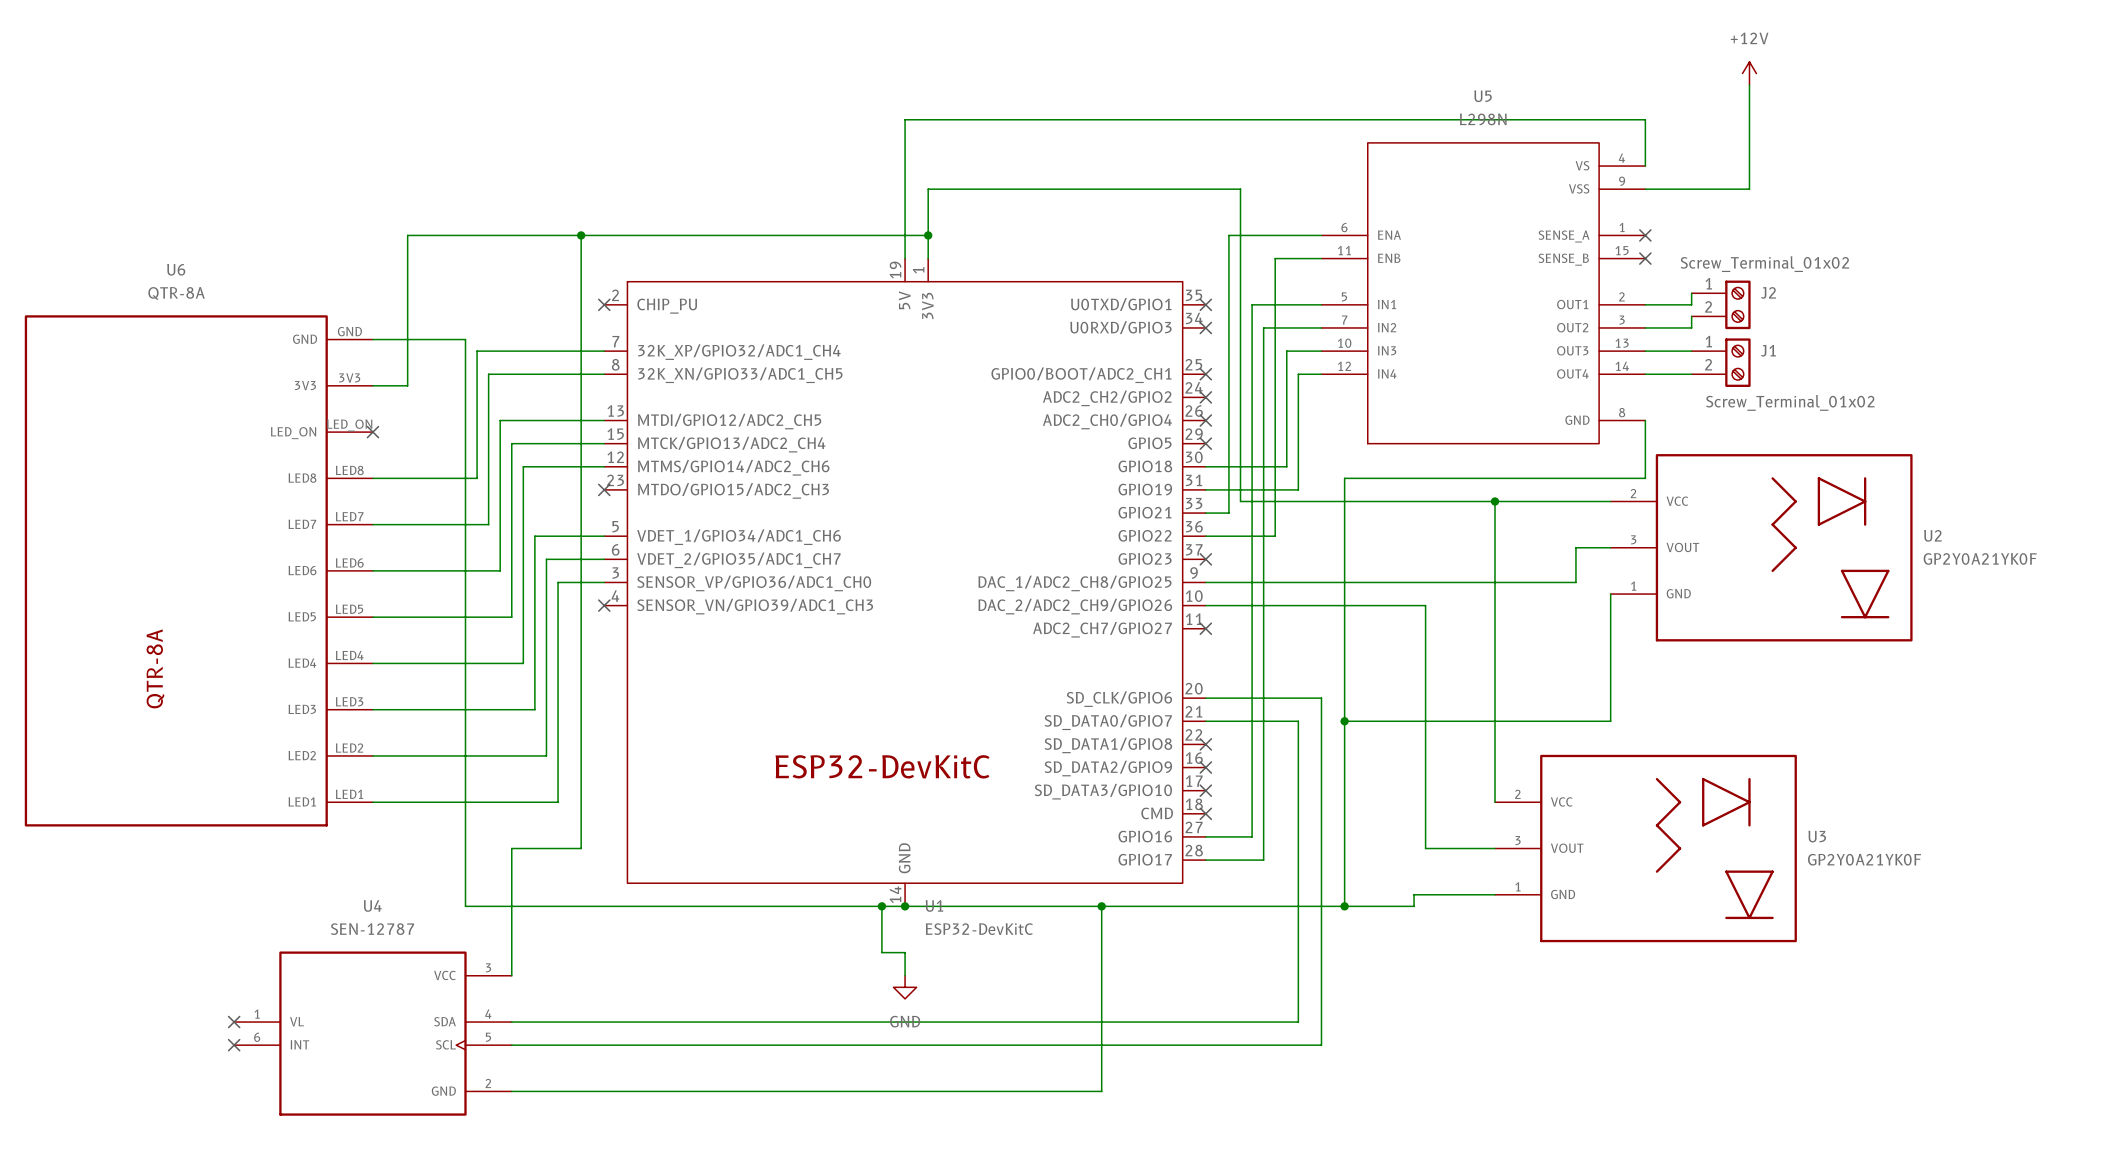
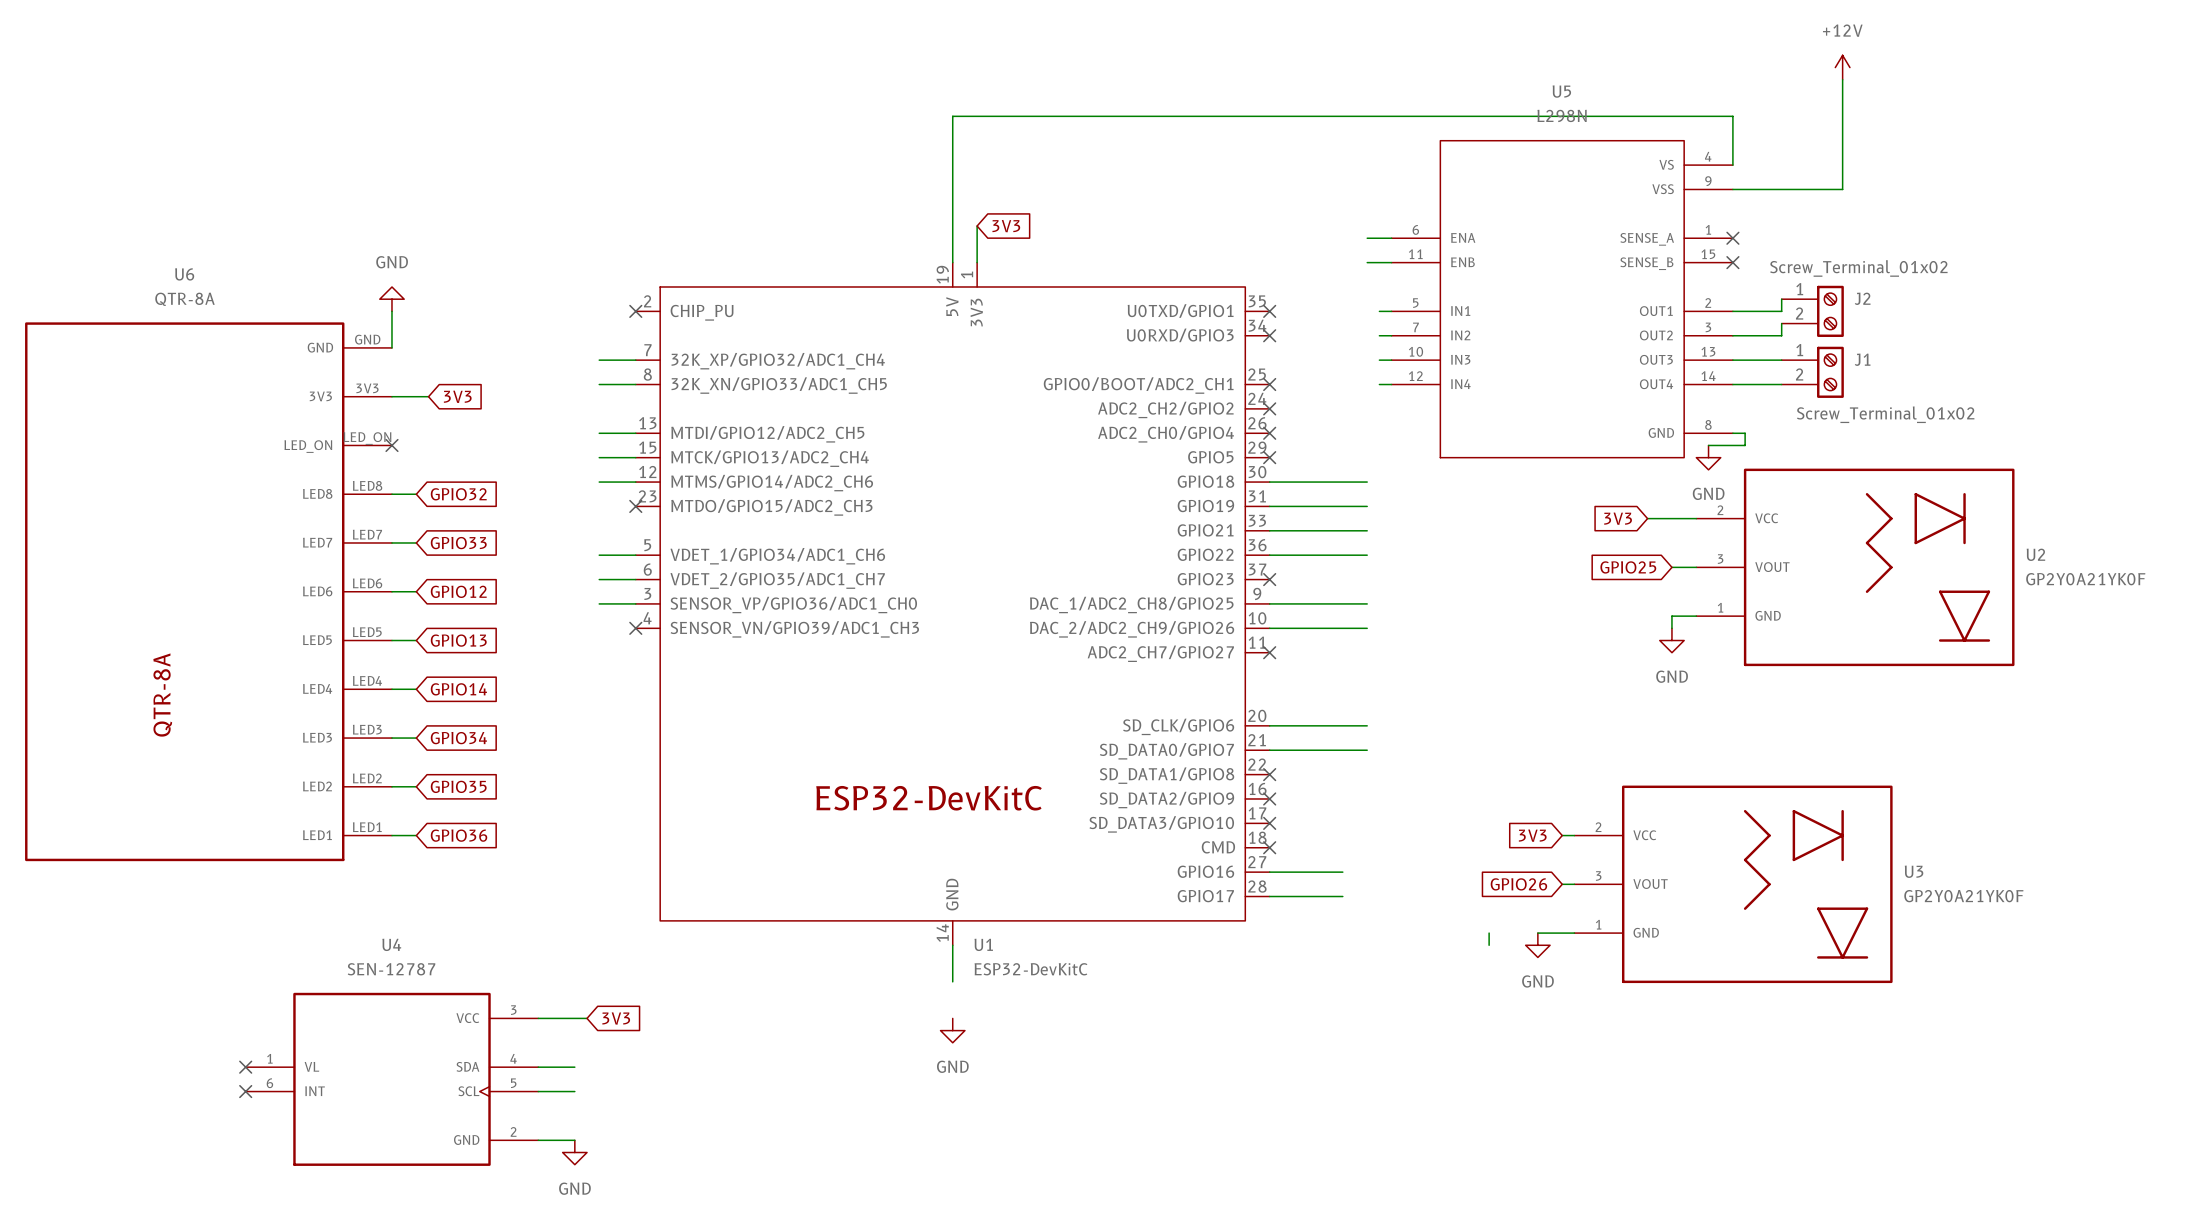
wire: (928, 223) (928, 189) (1240, 189) (1240, 501) (1564, 501) -> none
global label: none -> 3V3 (1006, 226)
wire: (581, 235) (581, 848) (511, 848) (511, 975) -> (587, 1018) (538, 1018)
junction: (581, 235) -> none
wire: (928, 235) (407, 235) (407, 385) -> none
junction: (928, 235) -> none
wire: (1298, 235) (1228, 235) (1228, 513) -> (1367, 530) (1294, 530)
wire: (1298, 258) (1275, 258) (1275, 536) -> (1367, 555) (1342, 555)
power symbol: none -> GND (391, 299)
wire: (1309, 304) (1252, 304) (1252, 836) -> (1342, 872) (1318, 872)
wire: (1309, 327) (1263, 327) (1263, 860) -> (1342, 896) (1330, 896)
wire: (372, 339) (465, 339) (465, 906) (1414, 906) -> (391, 347) (391, 311)
wire: (569, 351) (477, 351) (477, 478) (396, 478) -> none
wire: (1309, 351) (1286, 351) (1286, 466) -> (1367, 482) (1355, 482)
wire: (569, 374) (488, 374) (488, 524) (396, 524) -> none
wire: (1309, 374) (1298, 374) (1298, 489) -> none
global label: none -> 3V3 (457, 396)
wire: (569, 420) (500, 420) (500, 570) (396, 570) -> none
wire: (1645, 420) (1645, 478) (1344, 478) (1344, 906) -> (1732, 433) (1745, 433) (1745, 445) (1708, 445)
wire: (569, 443) (511, 443) (511, 617) (396, 617) -> none
power symbol: none -> GND (1708, 457)
wire: (569, 466) (523, 466) (523, 663) (396, 663) -> none
global label: none -> GPIO32 (458, 494)
wire: (1494, 501) (1494, 802) -> (1562, 835) (1574, 835)
junction: (1494, 501) -> none
global label: none -> 3V3 (1618, 518)
global label: none -> GPIO33 (458, 543)
wire: (569, 536) (534, 536) (534, 709) (396, 709) -> none
global label: none -> GPIO25 (1628, 567)
wire: (1587, 547) (1575, 547) (1575, 582) (1298, 582) -> none
wire: (569, 559) (546, 559) (546, 755) (396, 755) -> none
global label: none -> GPIO12 (458, 591)
wire: (569, 582) (558, 582) (558, 802) (396, 802) -> none
wire: (1610, 594) (1610, 721) (1344, 721) -> (1696, 616) (1671, 616) (1671, 628)
wire: (1298, 605) (1425, 605) (1425, 848) (1483, 848) -> none
global label: none -> GPIO13 (458, 640)
power symbol: none -> GND (1671, 640)
global label: none -> GPIO14 (458, 689)
wire: (1298, 698) (1321, 698) (1321, 1045) (546, 1045) -> none
global label: none -> GPIO34 (458, 738)
wire: (1298, 721) (1298, 1022) (546, 1022) -> none
junction: (1344, 721) -> none
global label: none -> GPIO35 (458, 786)
global label: none -> GPIO36 (459, 835)
global label: none -> 3V3 (1532, 835)
global label: none -> GPIO26 (1518, 884)
wire: (1414, 894) (1460, 894) -> none
wire: (881, 906) (881, 952) (905, 952) (905, 975) -> none
junction: (881, 906) -> none
wire: none -> (952, 945) (952, 981)
junction: (905, 906) -> none
wire: (1101, 906) (1101, 1091) (546, 1091) -> none
junction: (1101, 906) -> none
junction: (1344, 906) -> none
power symbol: none -> GND (1537, 945)
global label: none -> 3V3 (616, 1018)
power symbol: none -> GND (574, 1152)

